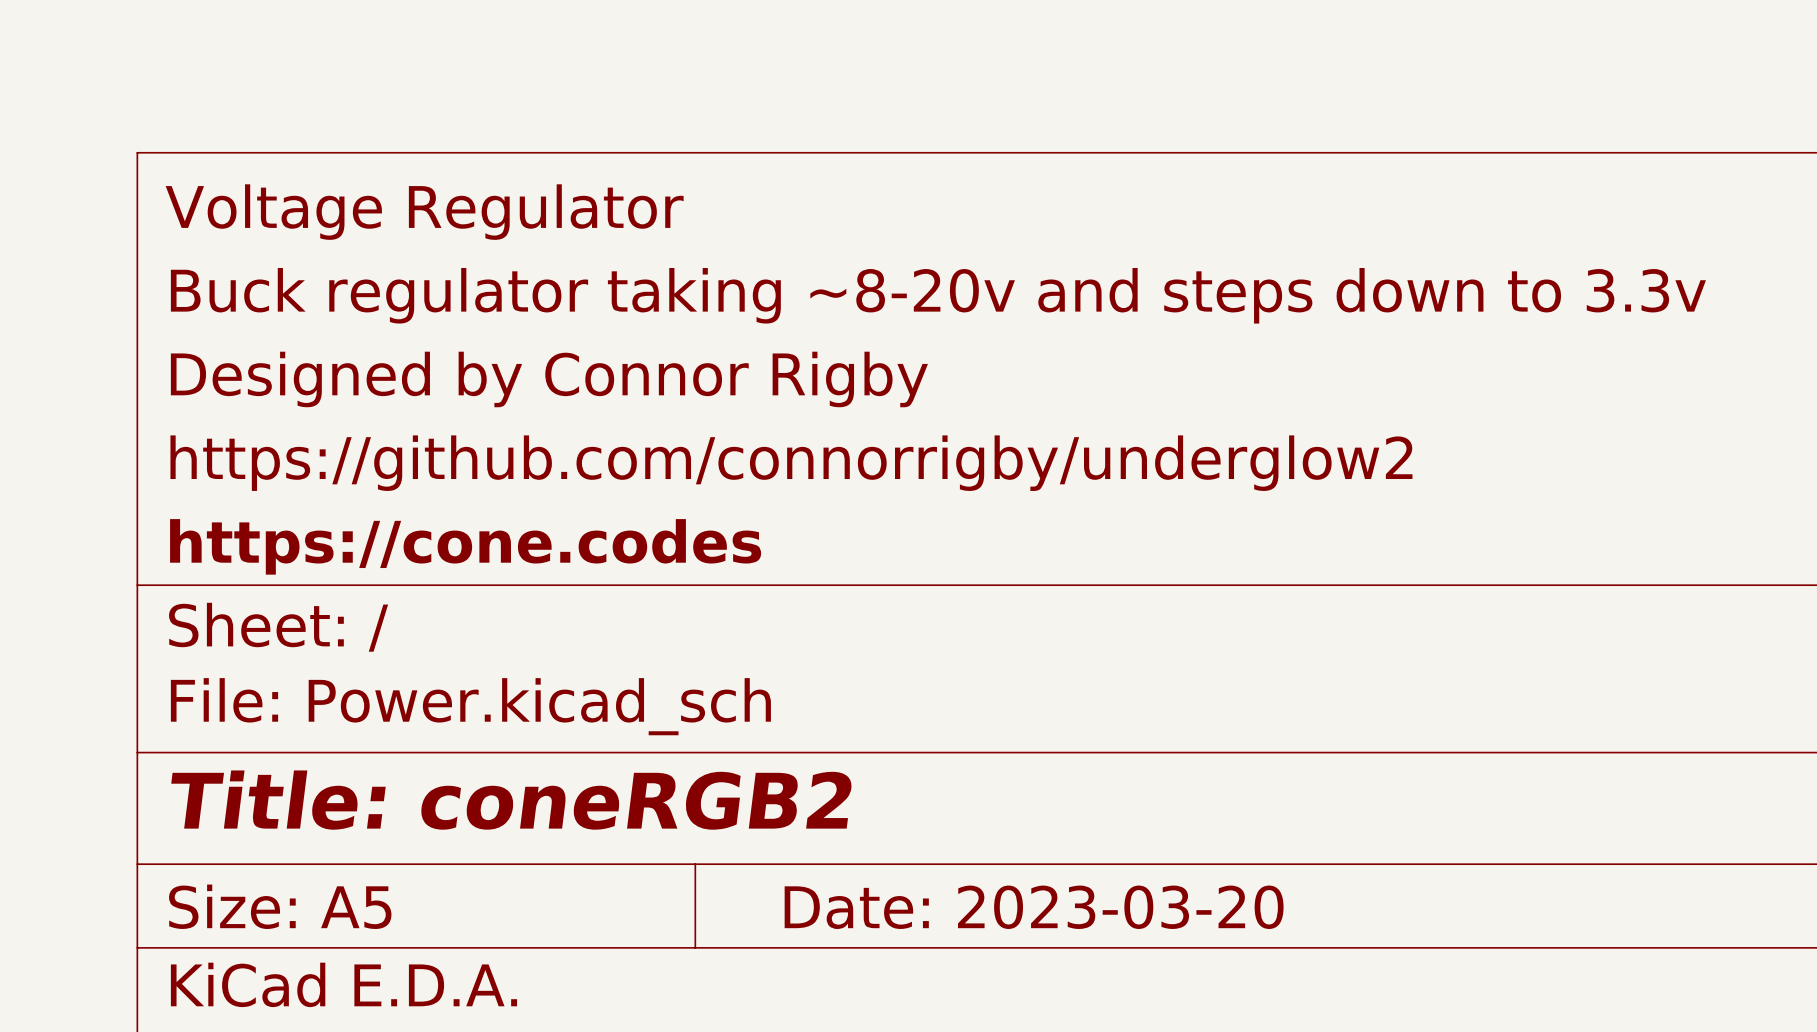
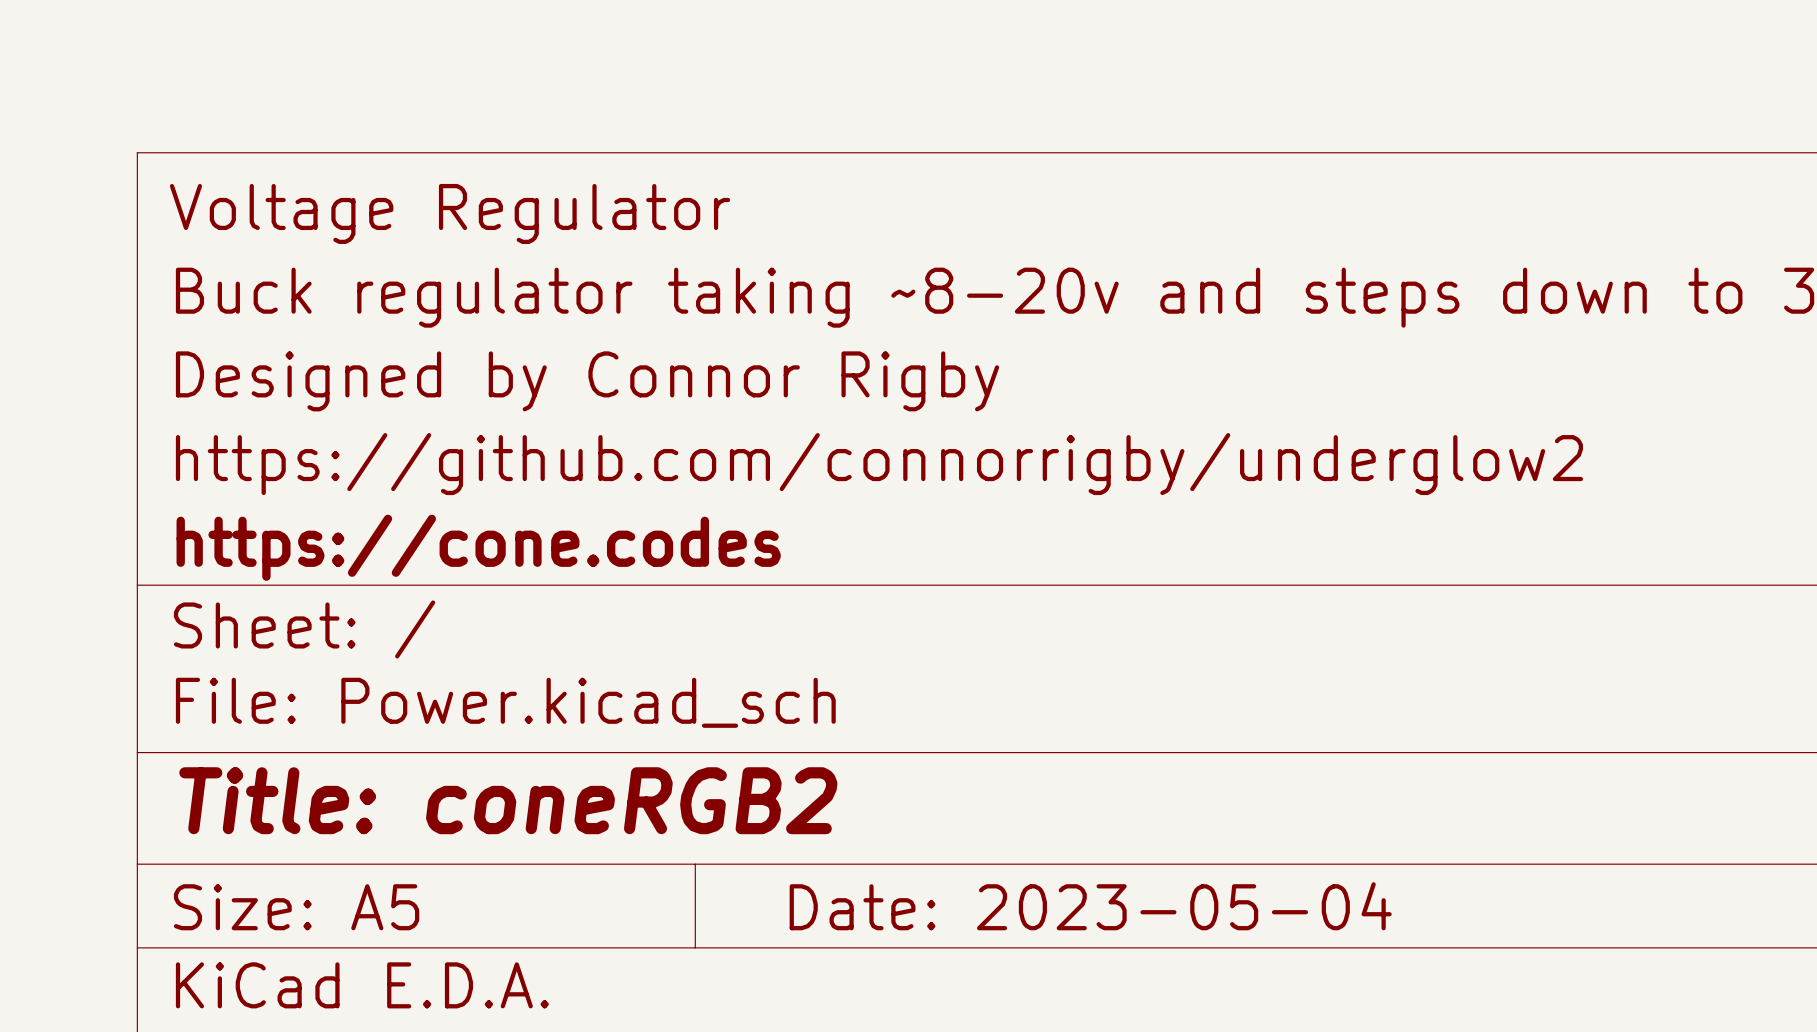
title block: Date: 2023-03-20 (1034, 907) -> Date: 2023-05-04 (1090, 906)

